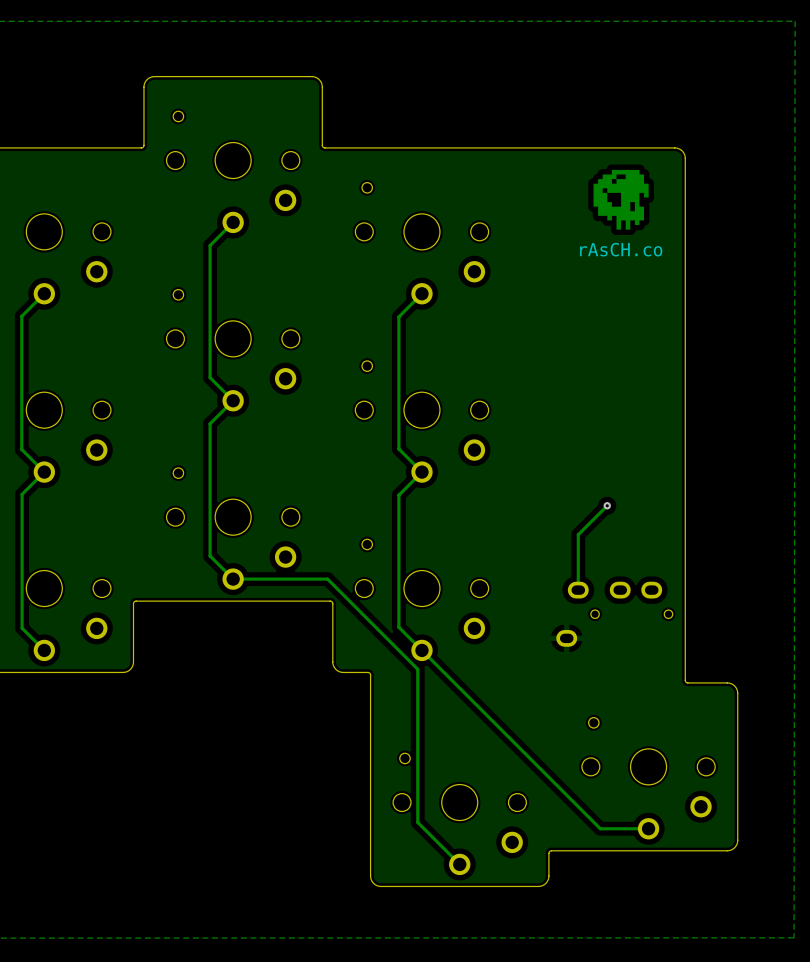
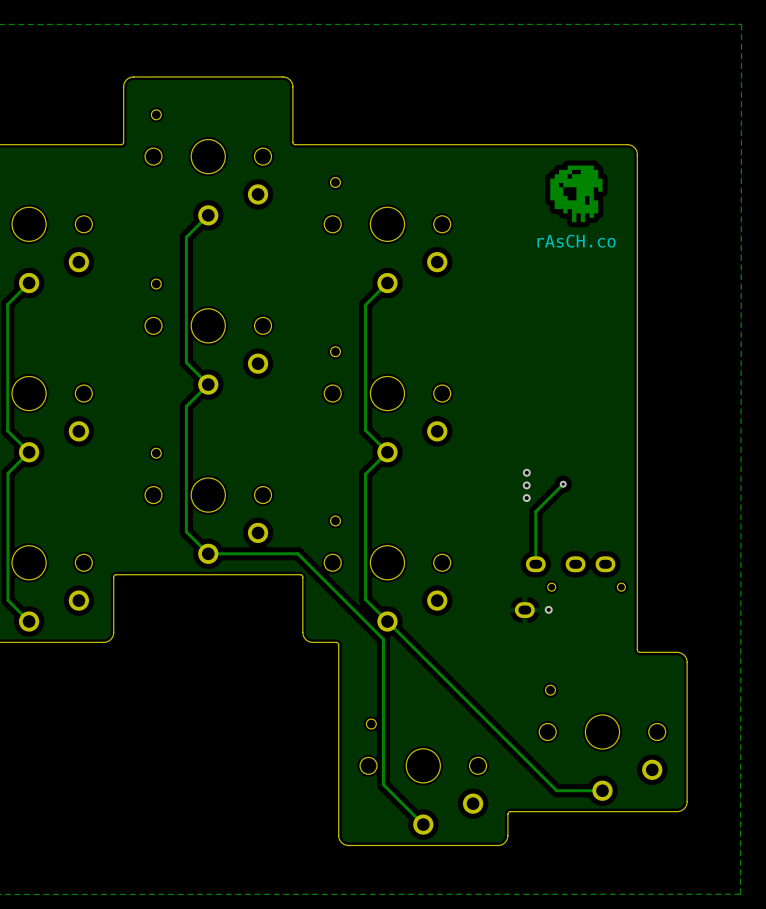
via: none -> (526, 472)
via: none -> (526, 485)
via: none -> (526, 498)
via: none -> (548, 609)

